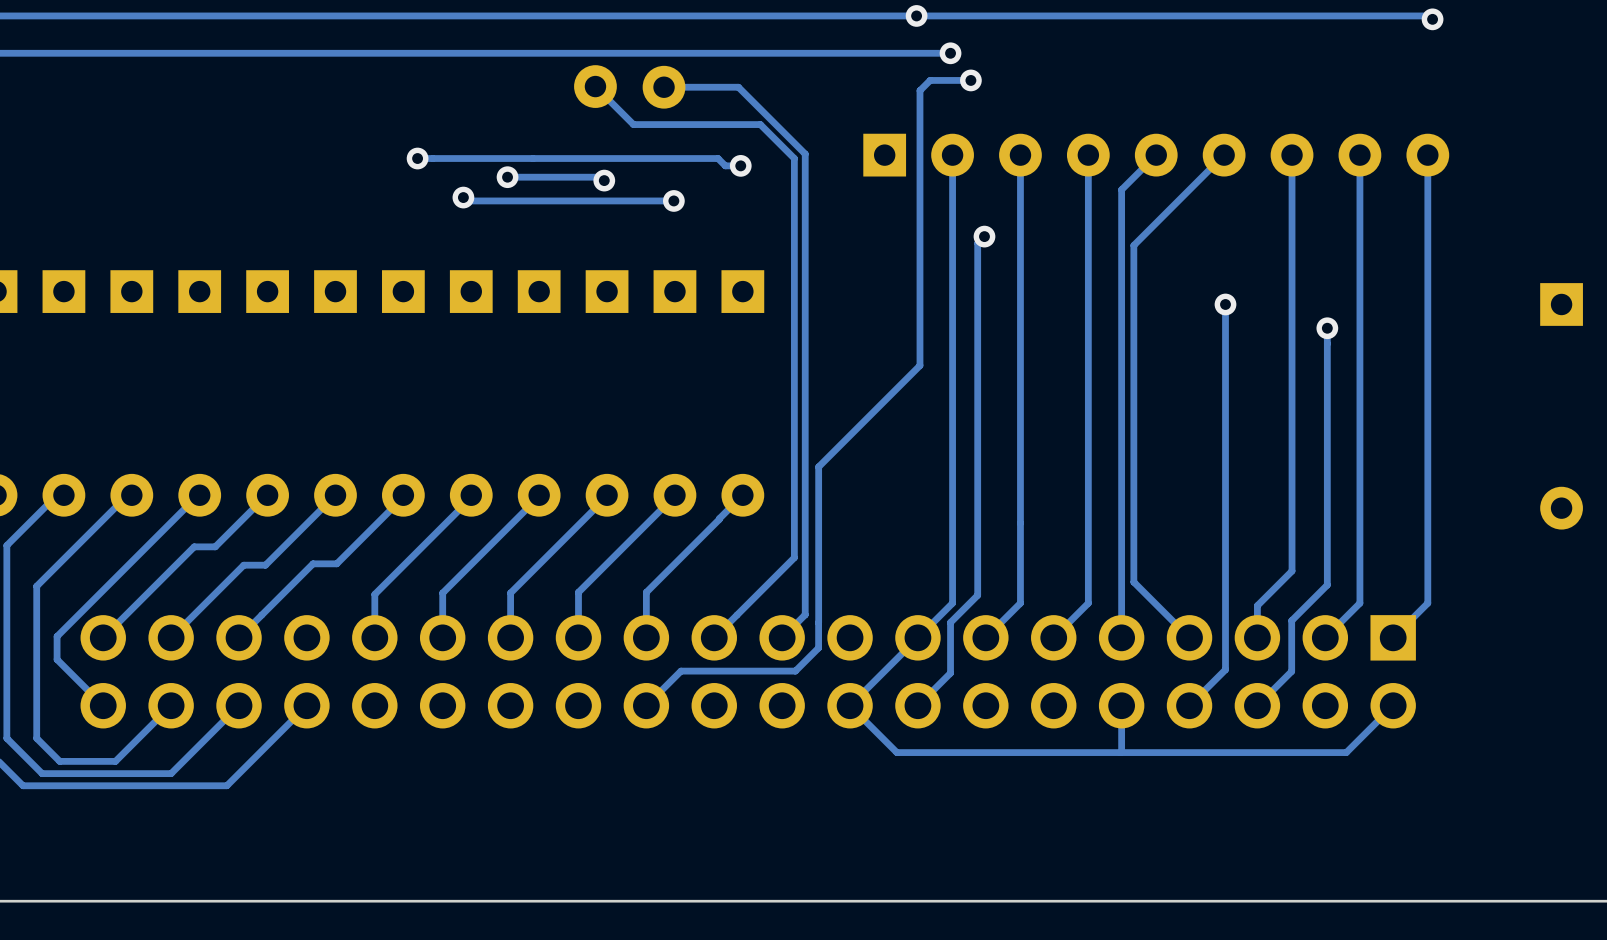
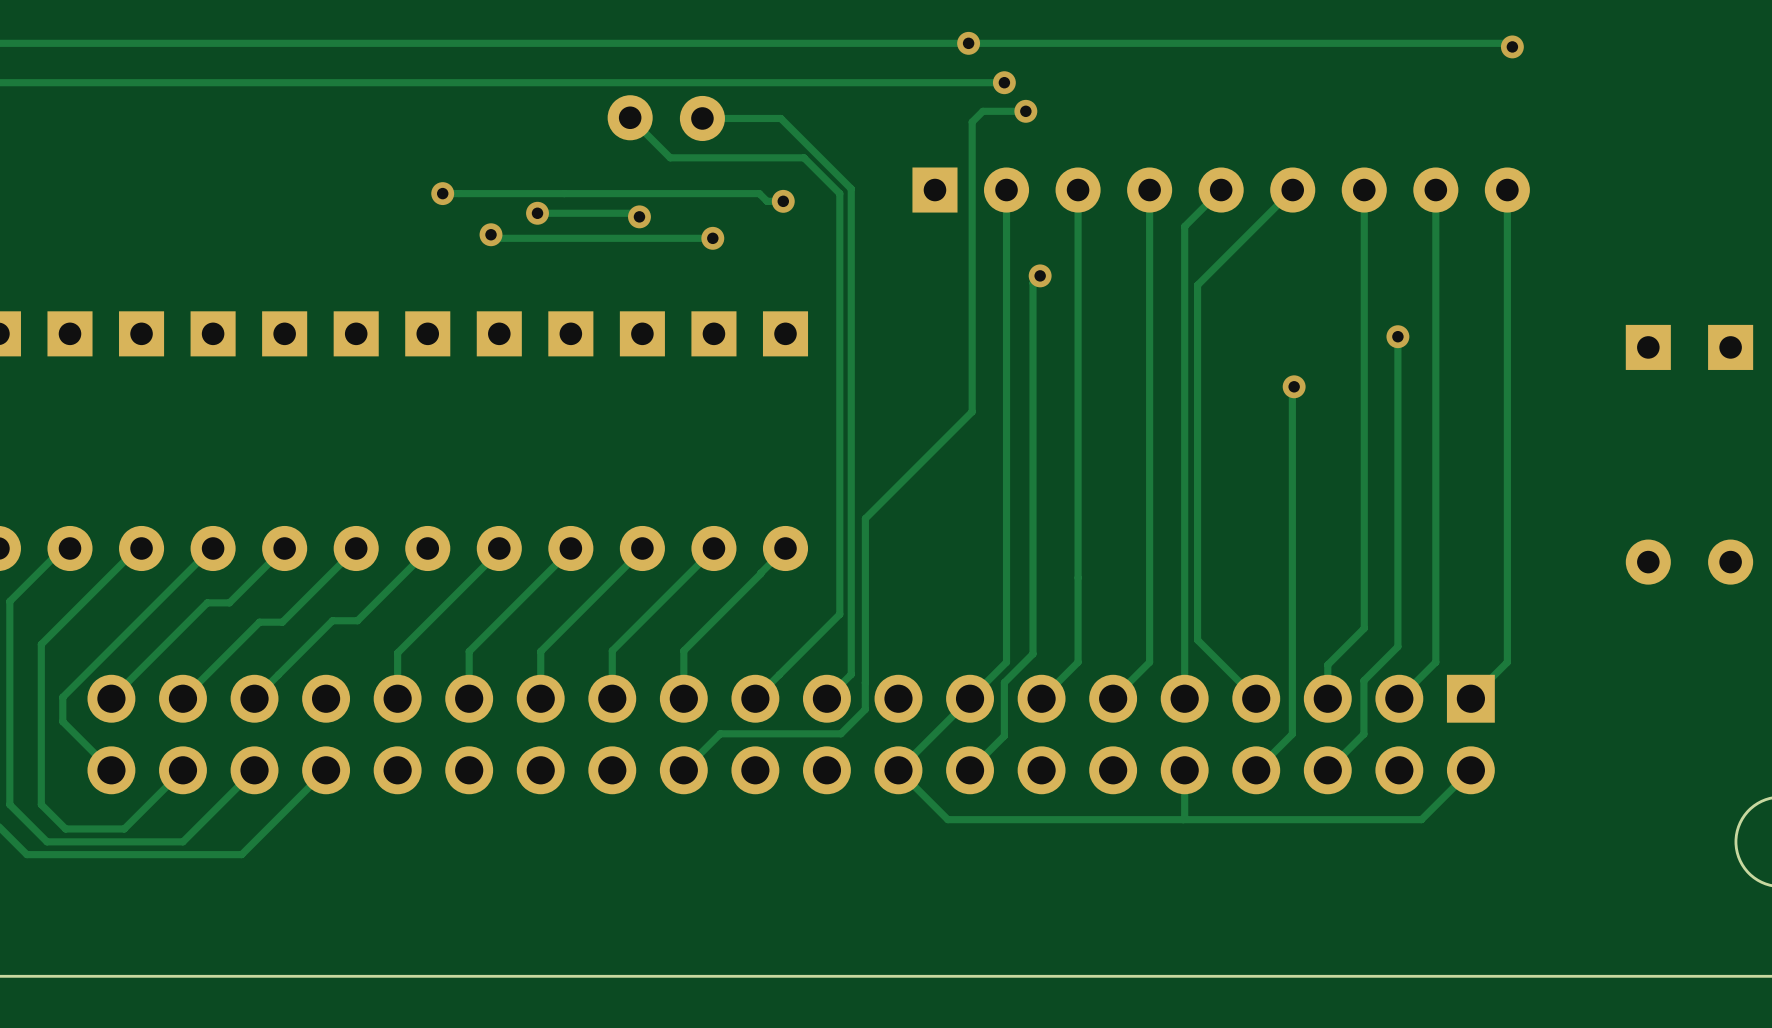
track: (1225, 304) (1225, 669) (1223, 671) -> (1292, 388) (1292, 734)
via position: (1225, 304) -> (1294, 386)
track: (1327, 328) (1327, 585) (1323, 588) -> (1397, 336) (1397, 646)
via position: (1327, 328) -> (1397, 336)

